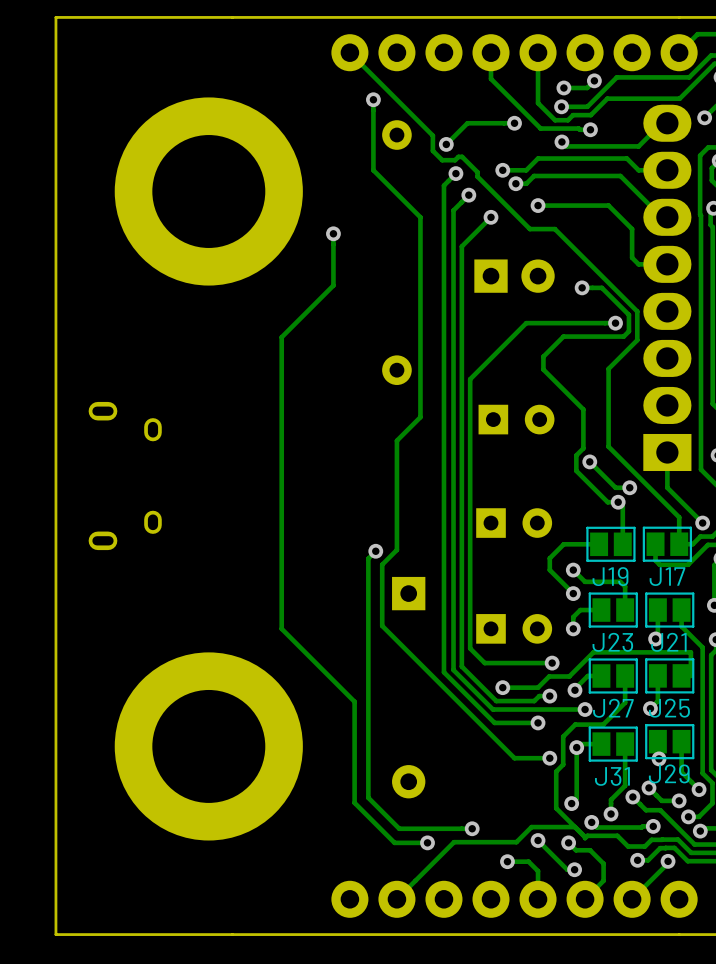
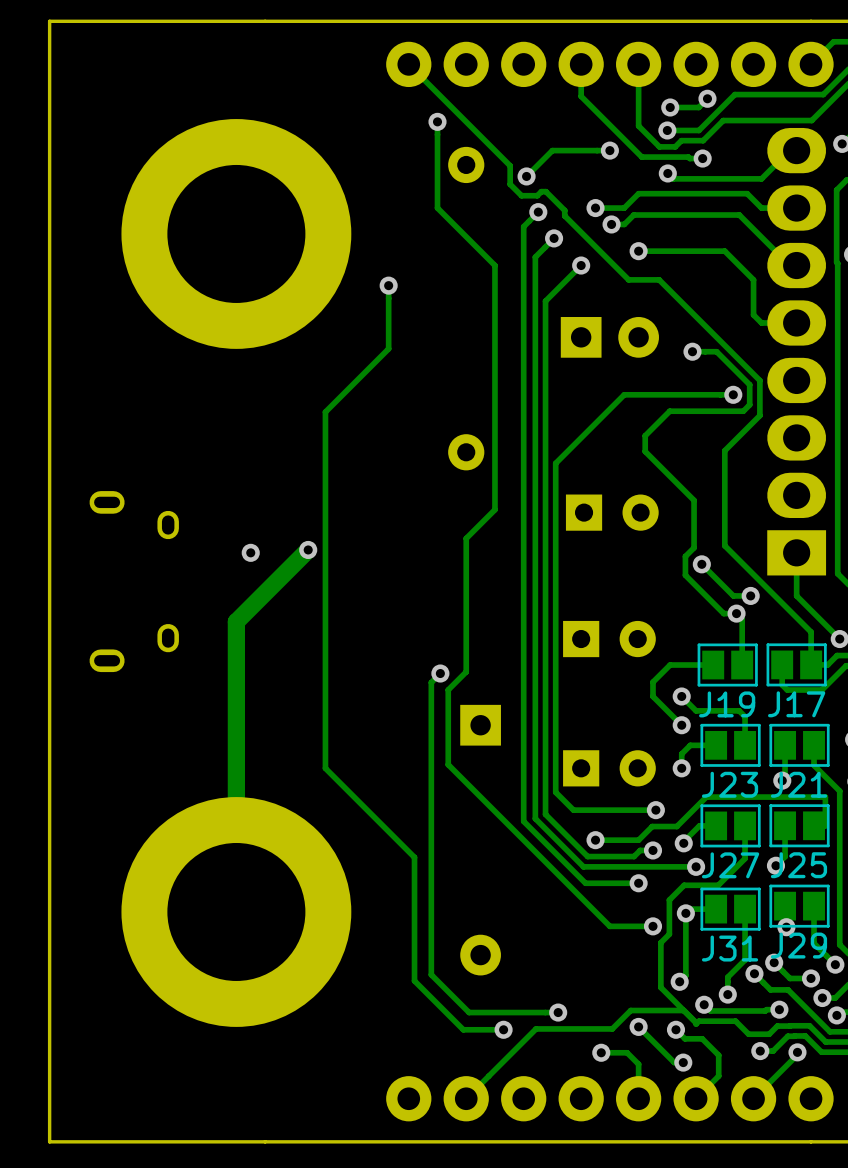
track: none -> (308, 549) (236, 621) (236, 911)
via: none -> (308, 549)
via: none -> (250, 552)

